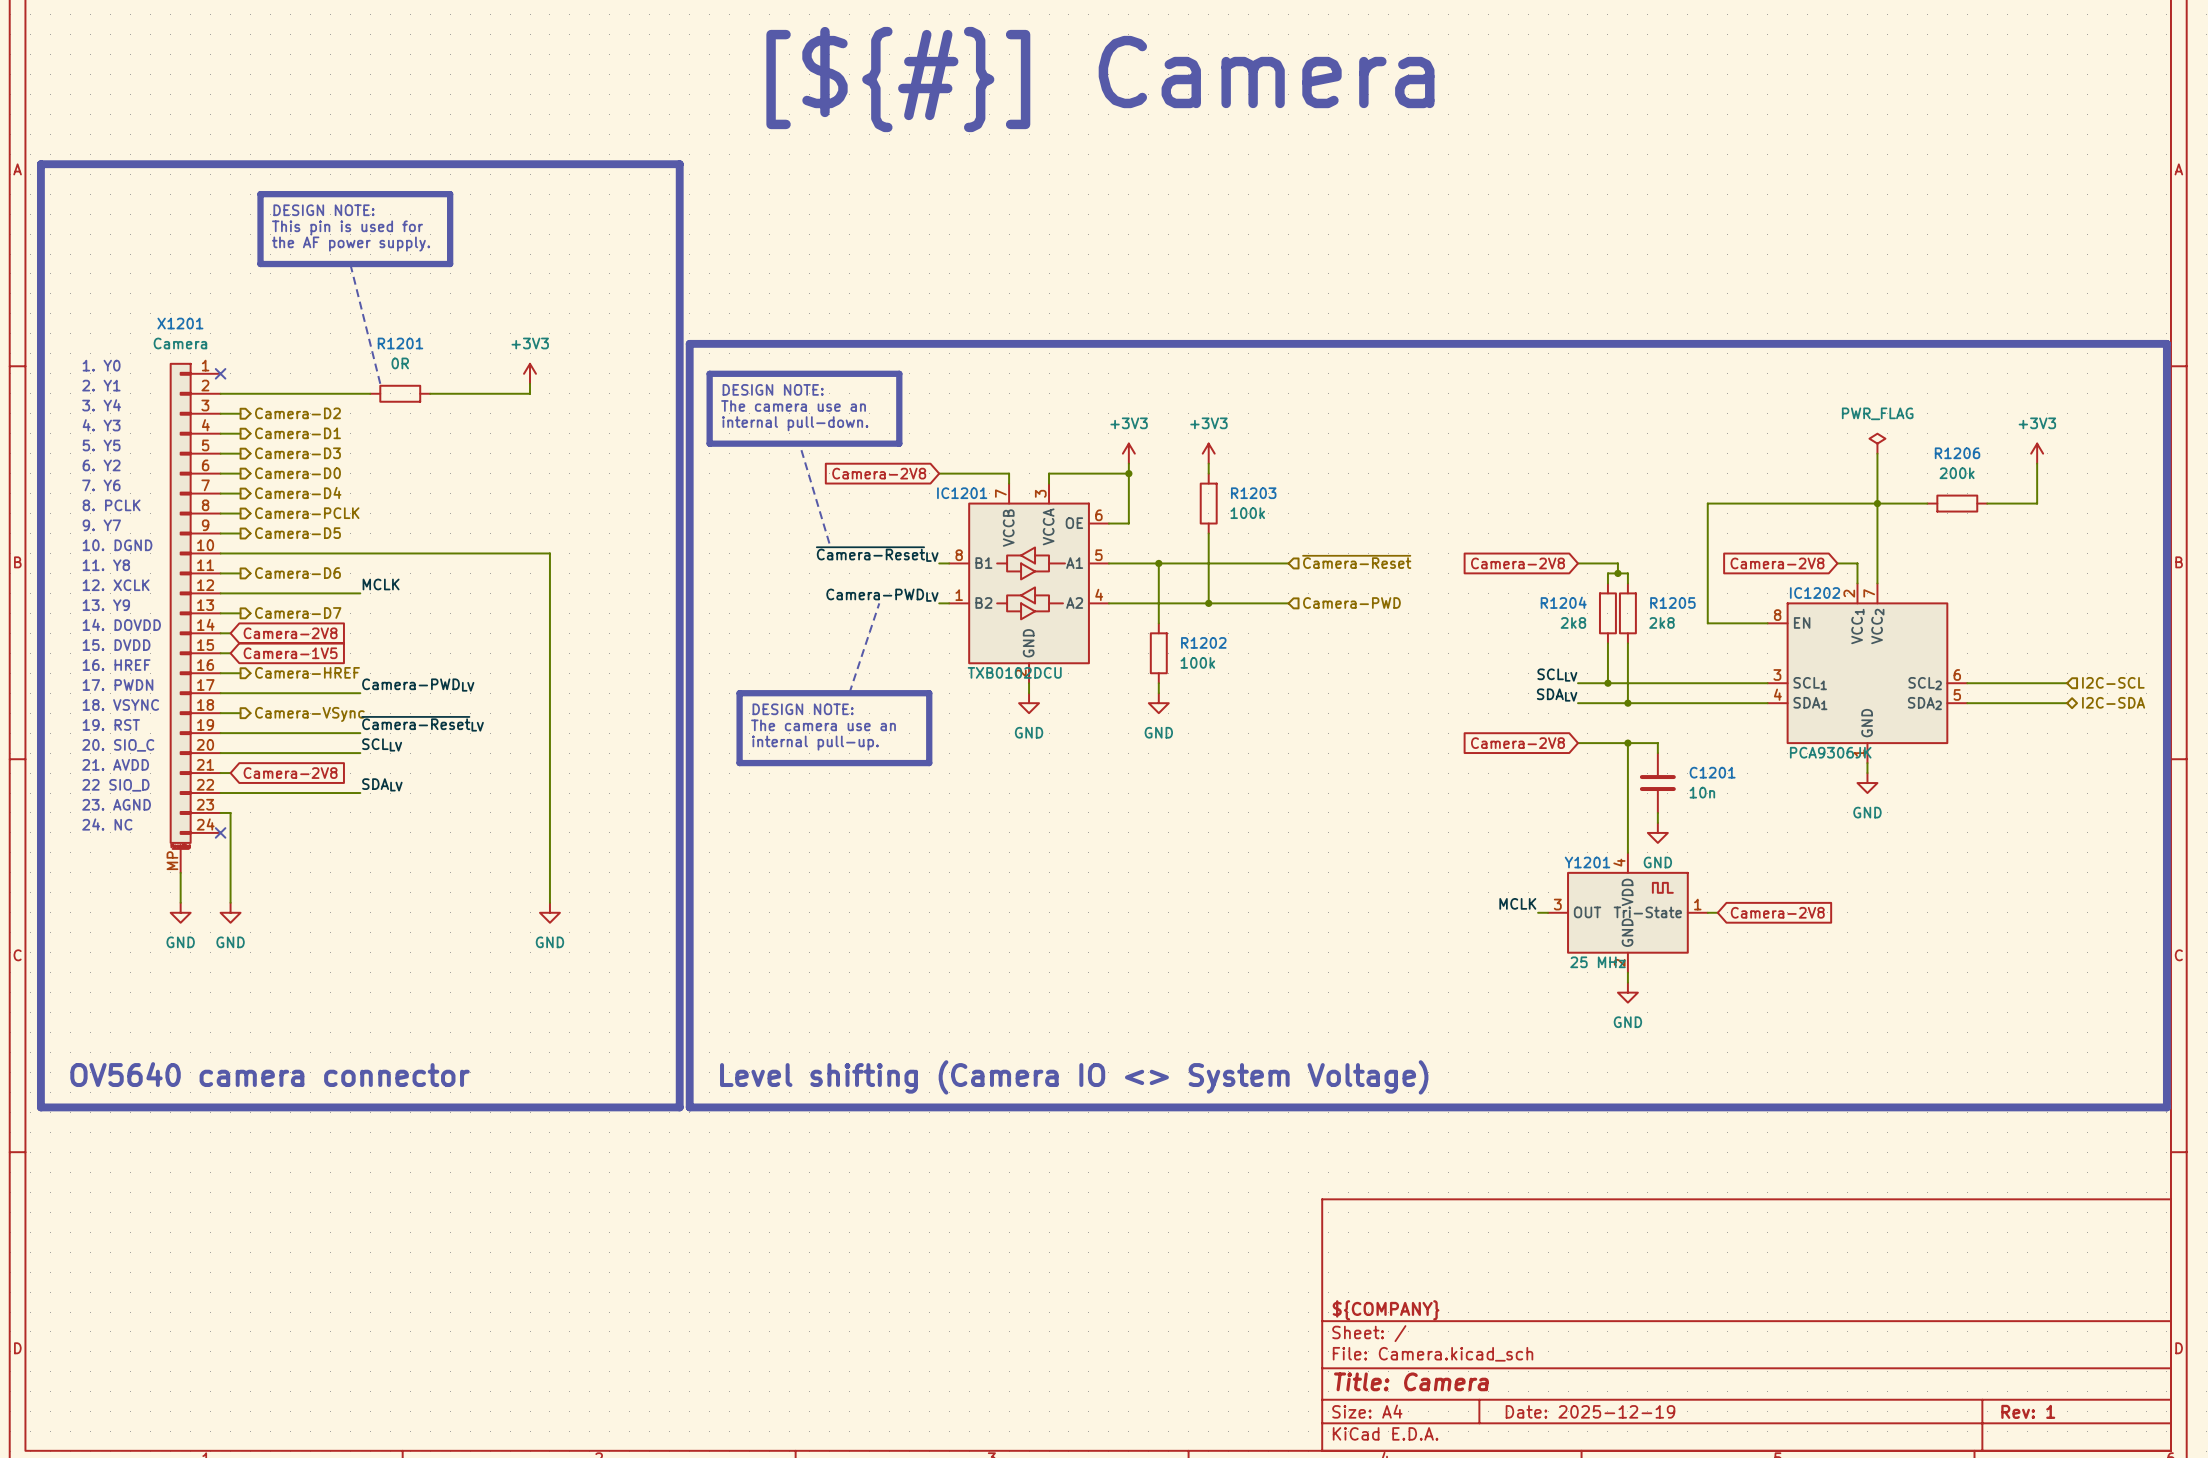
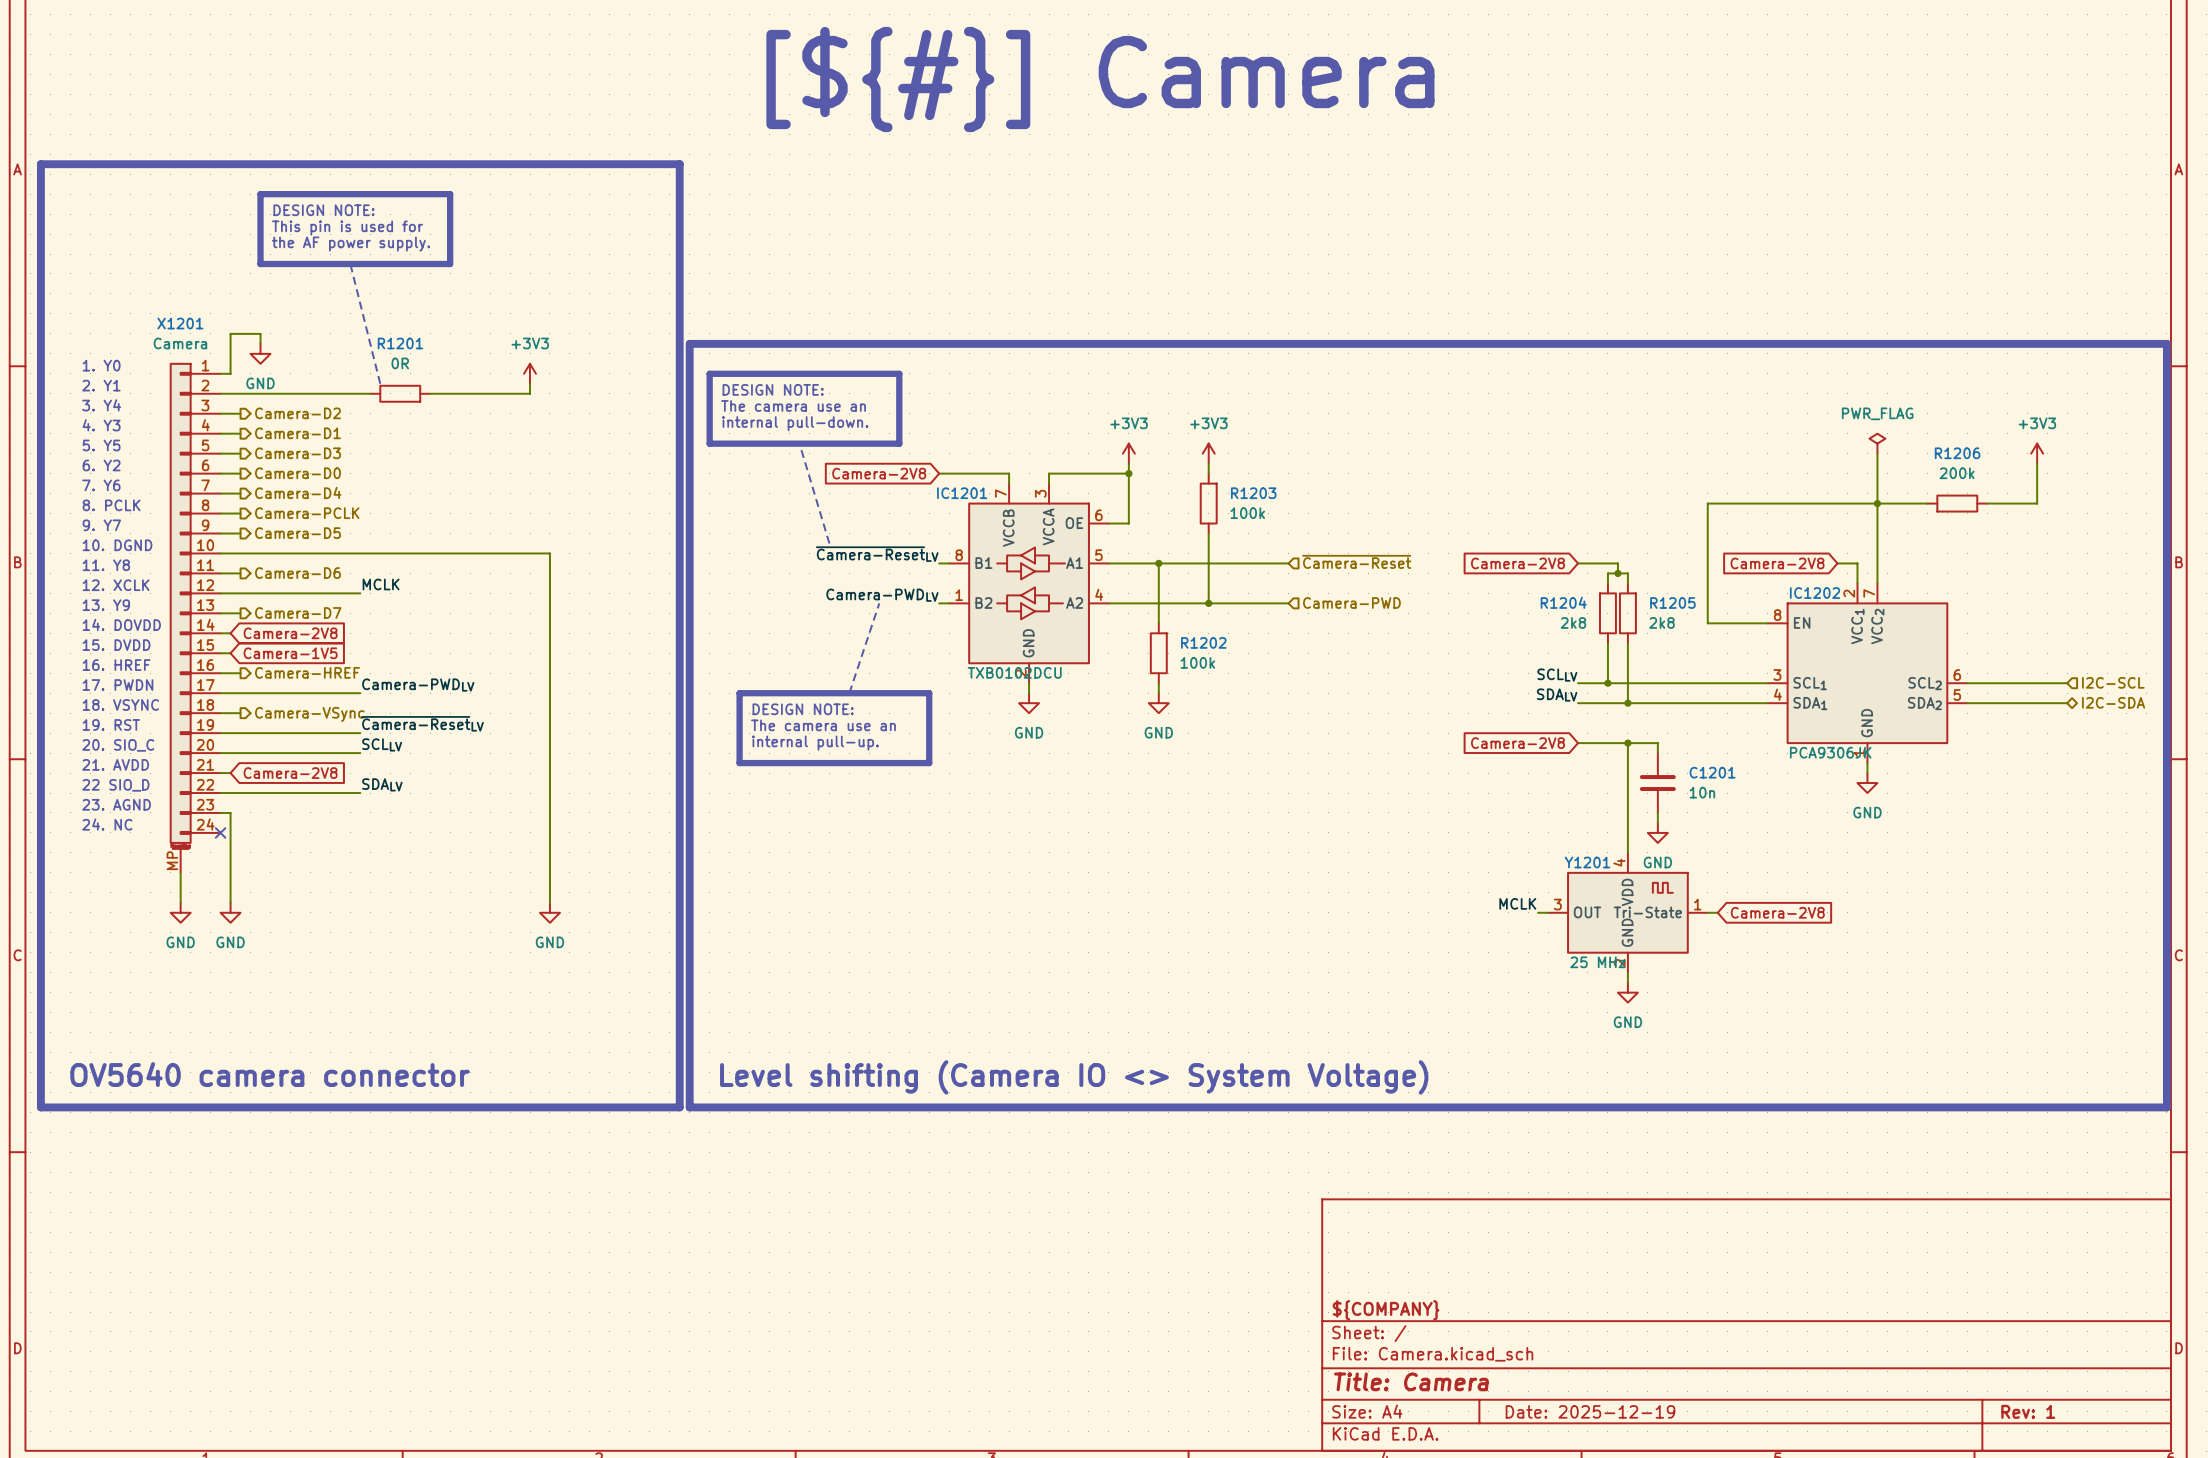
wire: none -> (260, 343) (260, 333) (230, 333) (230, 373) (220, 373)
power symbol: none -> GND (260, 353)
no-connect mark: (220, 373) -> none

